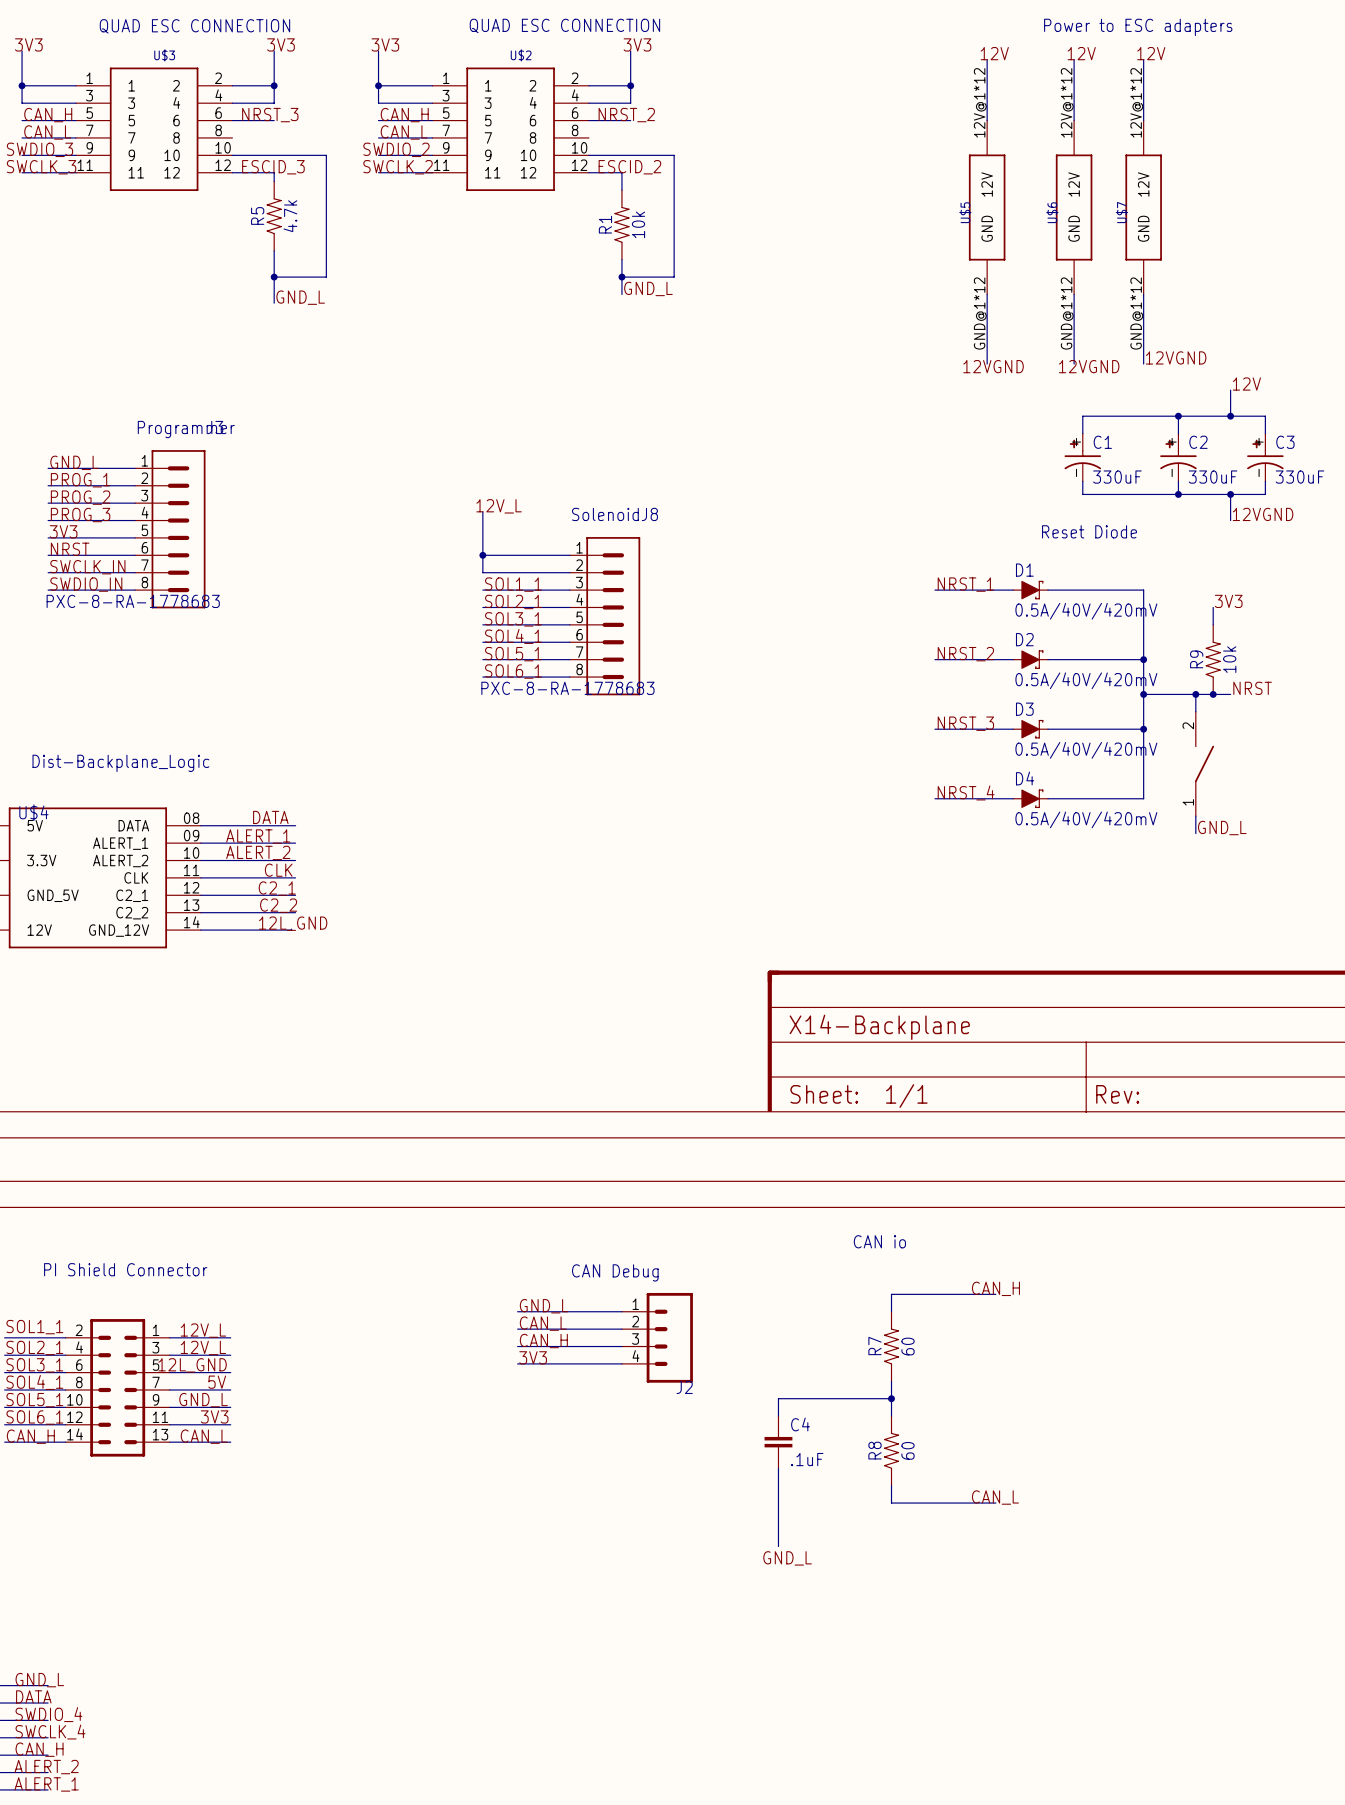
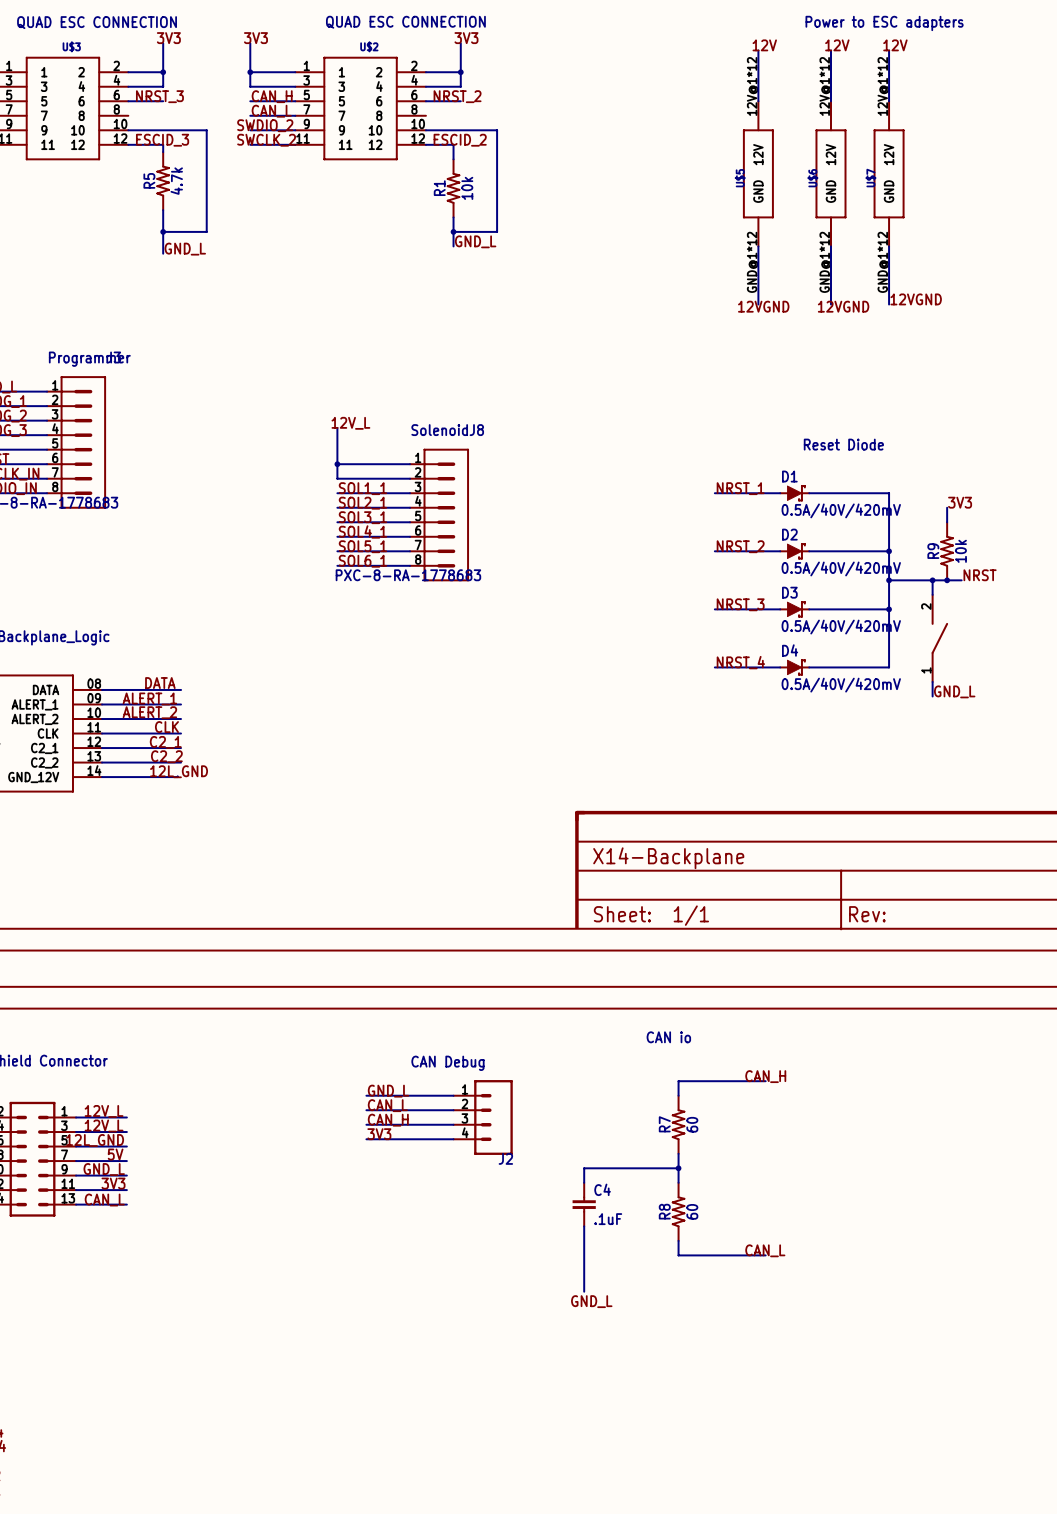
label: 12V (1246, 384) -> none
wire: (1230, 390) (1230, 416) -> none
wire: (1178, 416) (1178, 433) -> none
junction: (1178, 416) -> none
junction: (1230, 416) -> none
wire: (1082, 433) (1082, 416) (1265, 416) (1265, 433) -> none
C1: 330uF (1082, 457) -> none
C2: 330uF (1178, 457) -> none
C3: 330uF (1265, 457) -> none
wire: (1082, 481) (1082, 494) (1265, 494) (1265, 481) -> none
wire: (1178, 481) (1178, 494) -> none
junction: (1178, 494) -> none
wire: (1230, 494) (1230, 520) -> none
junction: (1230, 494) -> none
label: 12VGND (1263, 514) -> none

